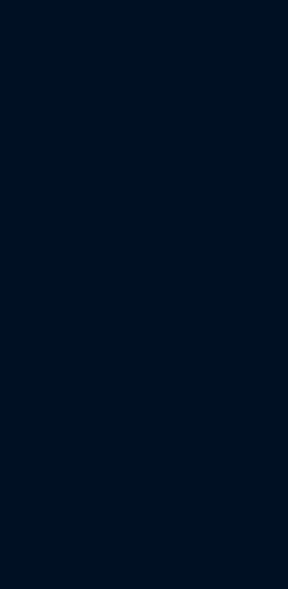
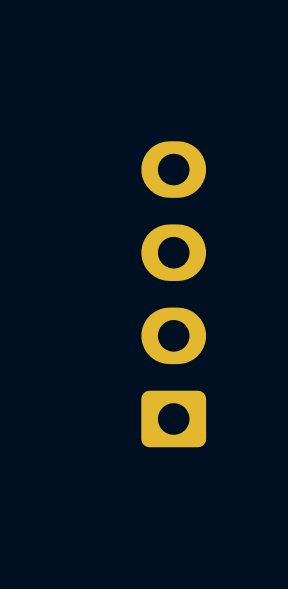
part: none -> (173, 294)

